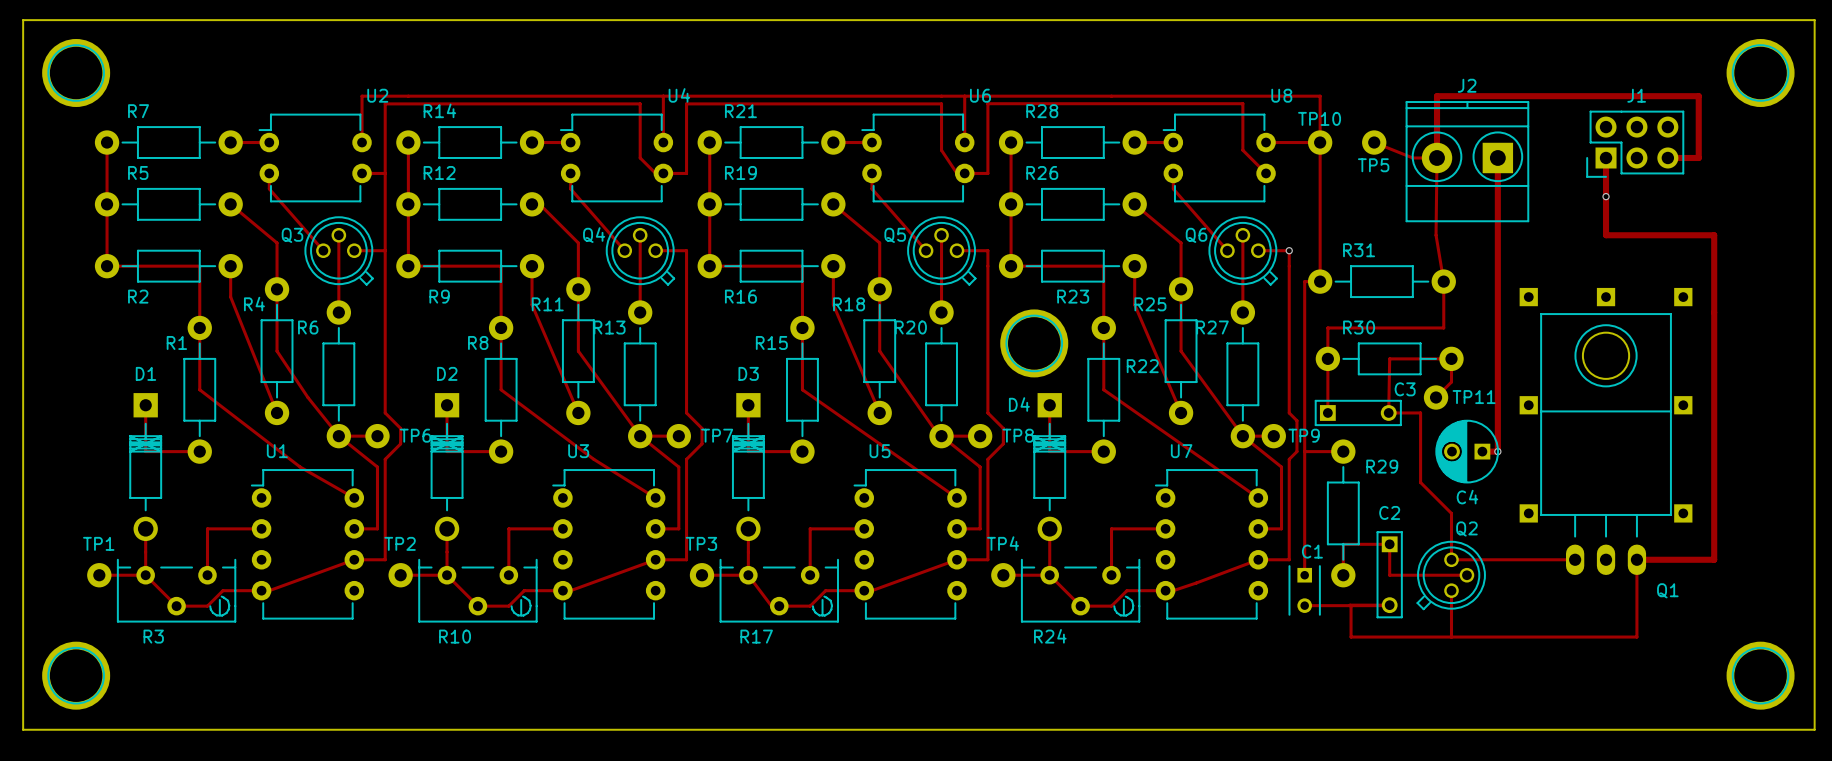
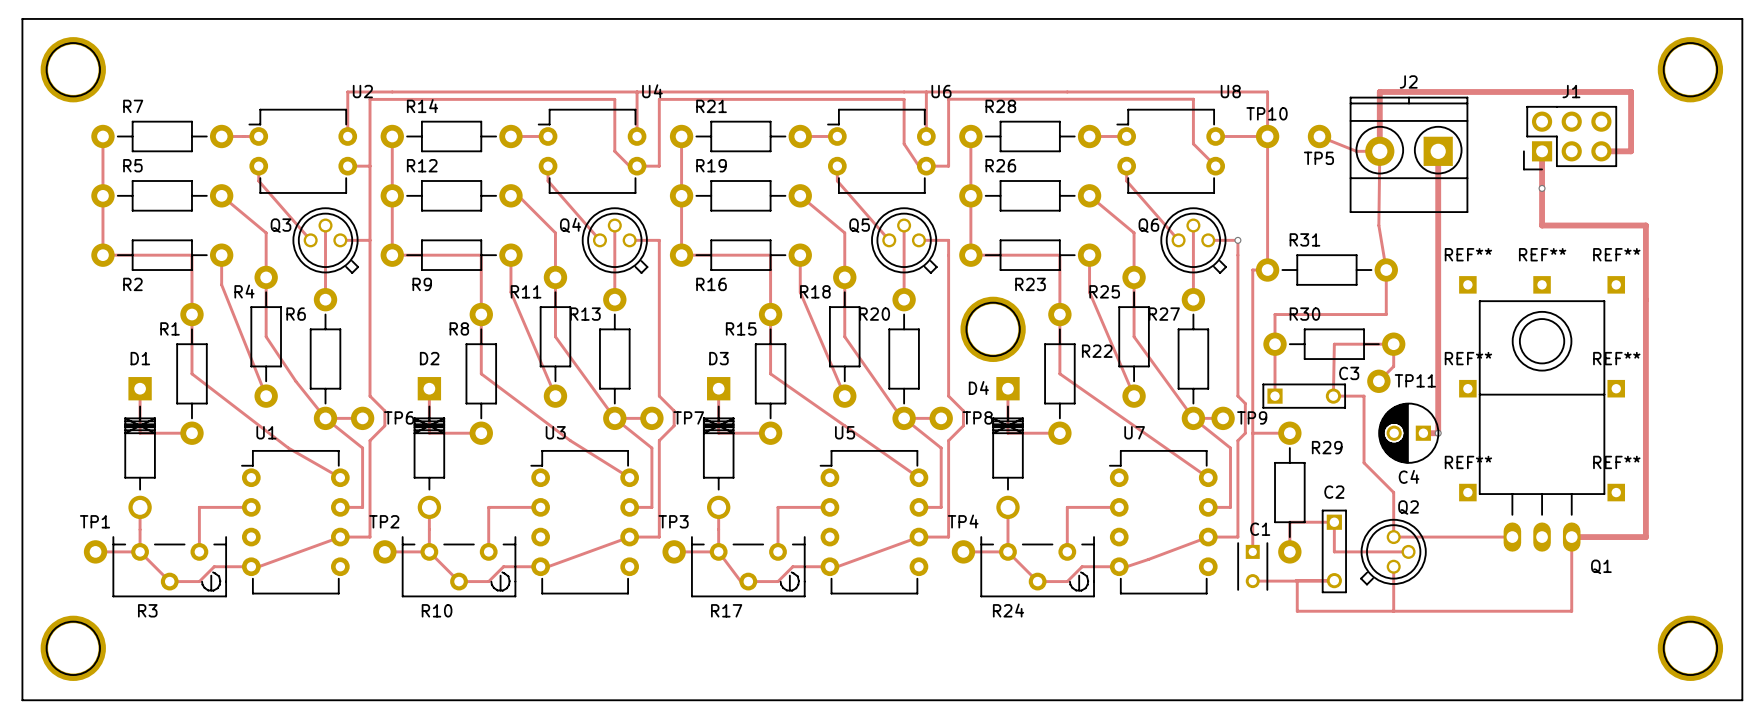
REF** name: none -> REF** (1468, 254)
REF** name: none -> REF** (1542, 254)
REF** name: none -> REF** (1616, 254)
REF** name: none -> REF** (1468, 358)
REF** name: none -> REF** (1616, 358)
REF** name: none -> REF** (1468, 462)
REF** name: none -> REF** (1616, 462)

